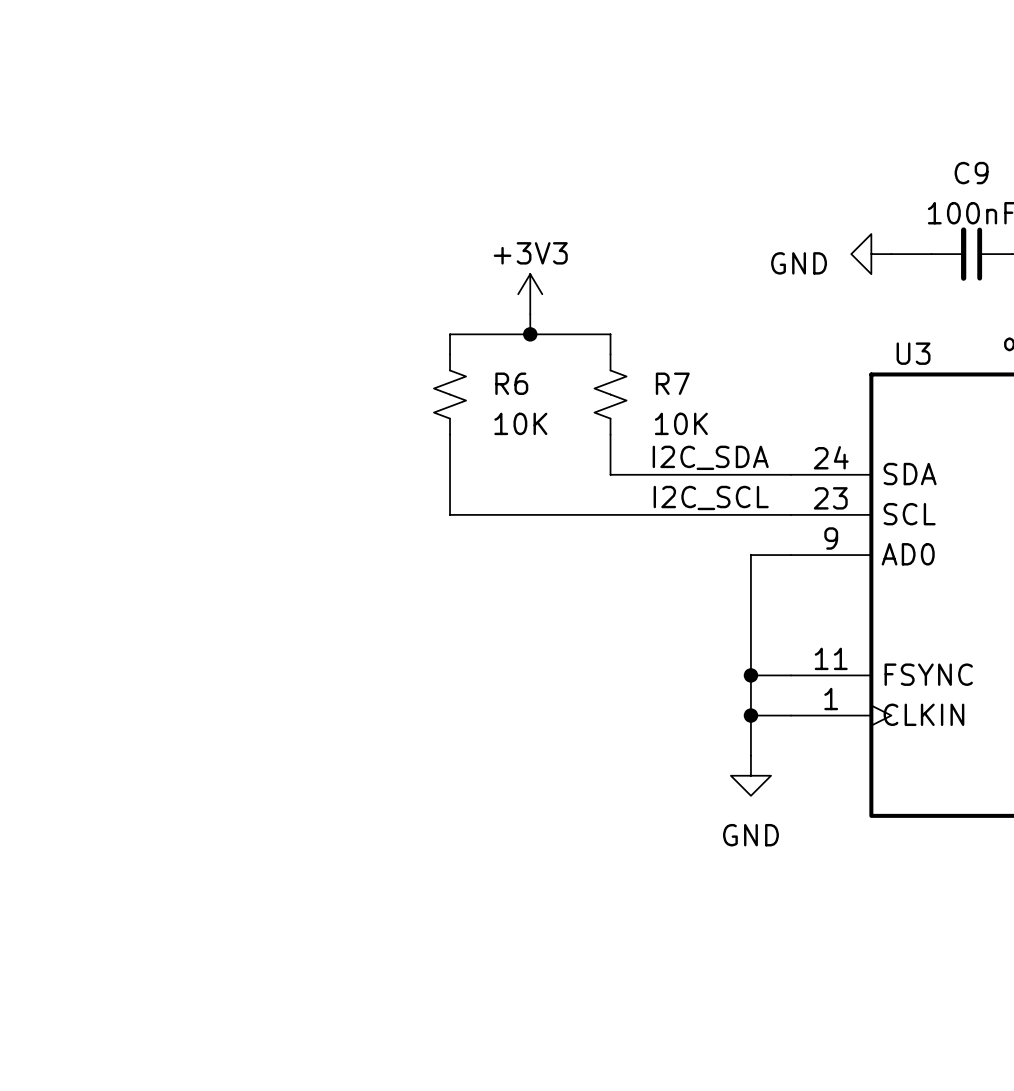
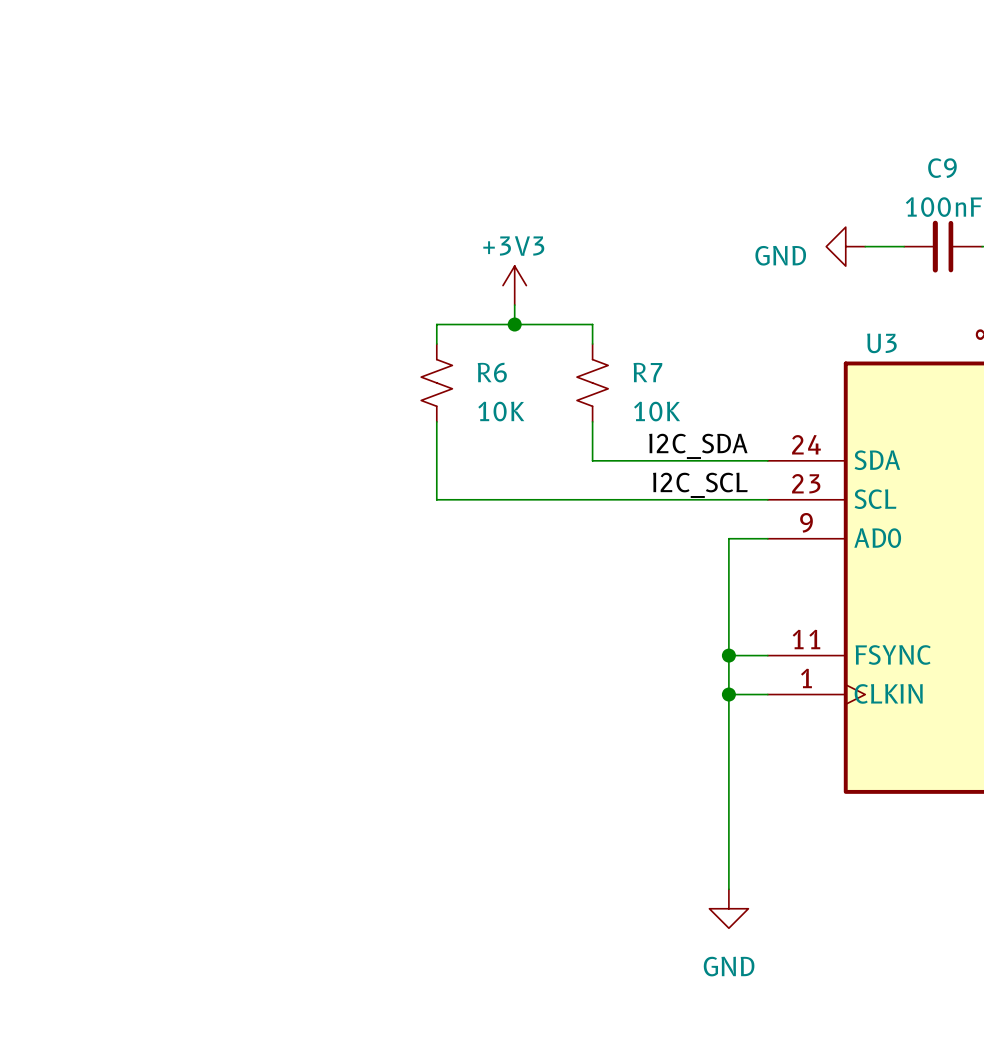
wire: none -> (728, 733) (728, 889)
power symbol position: GND (750, 775) -> GND (728, 908)

